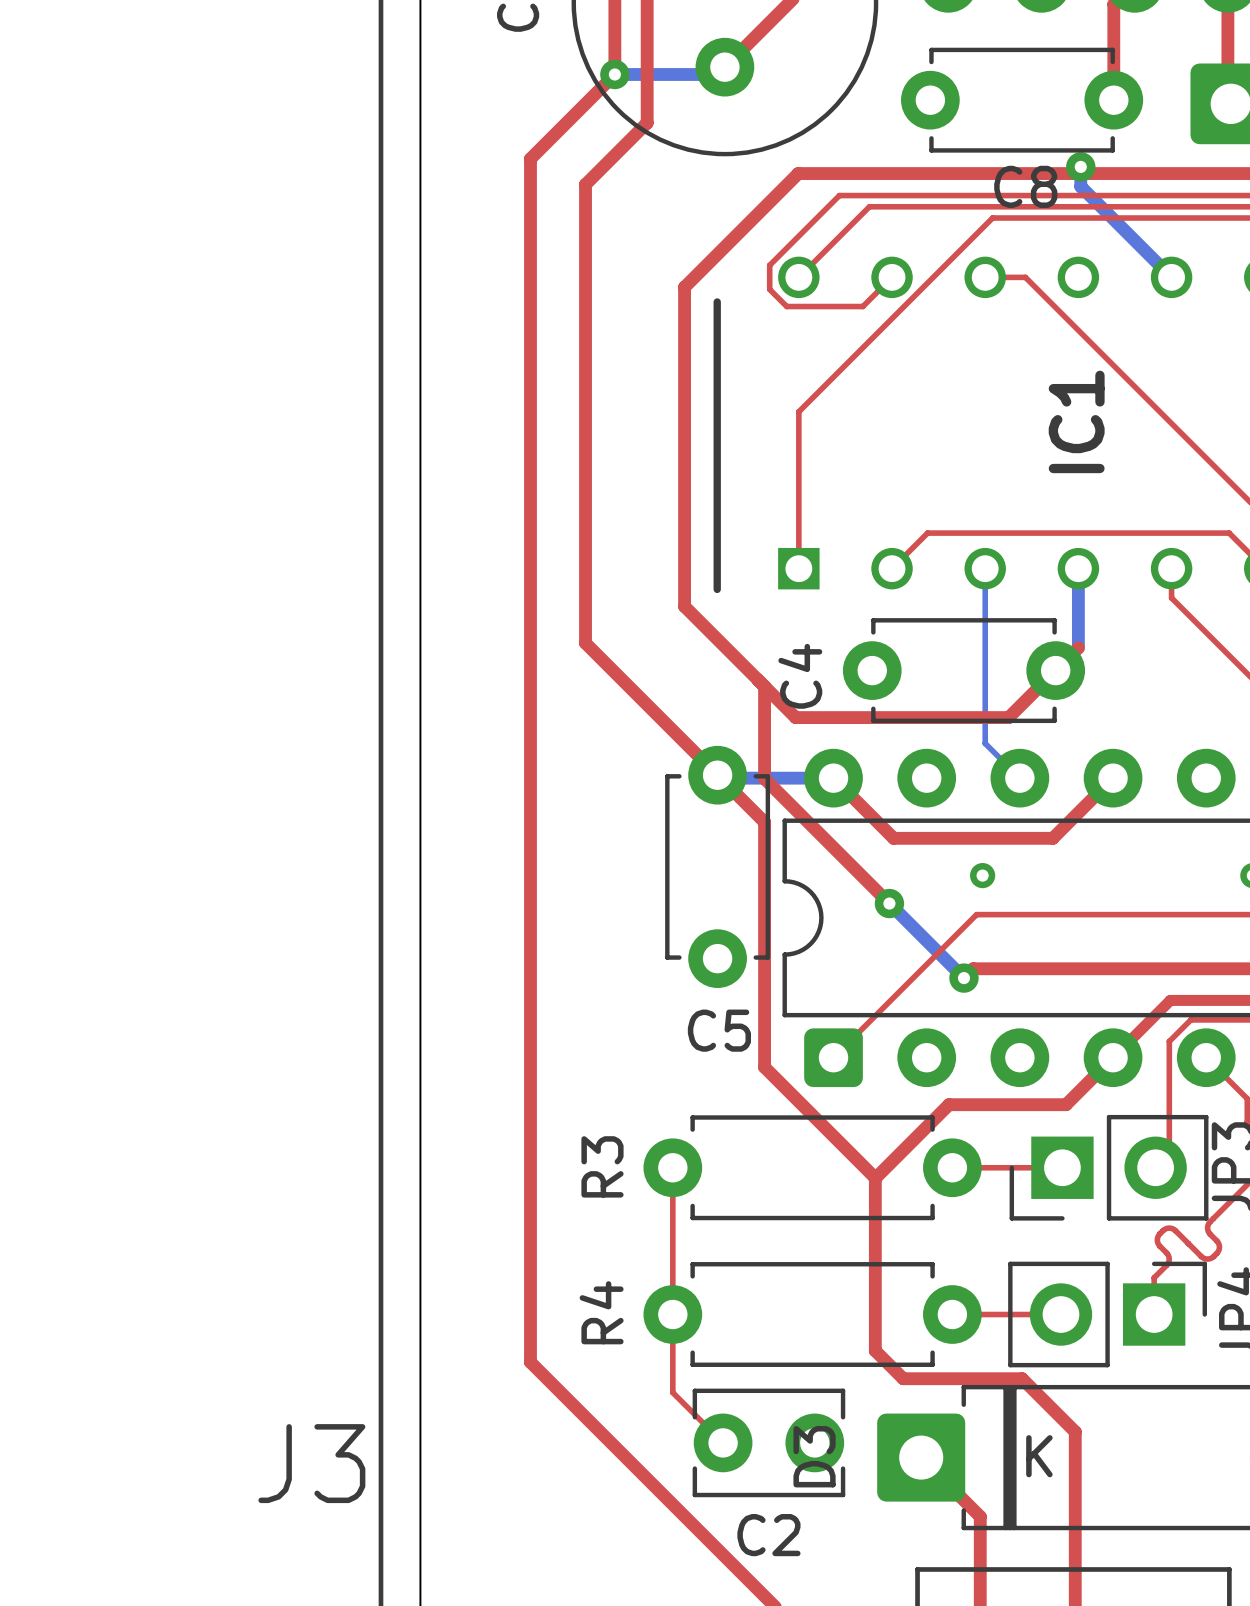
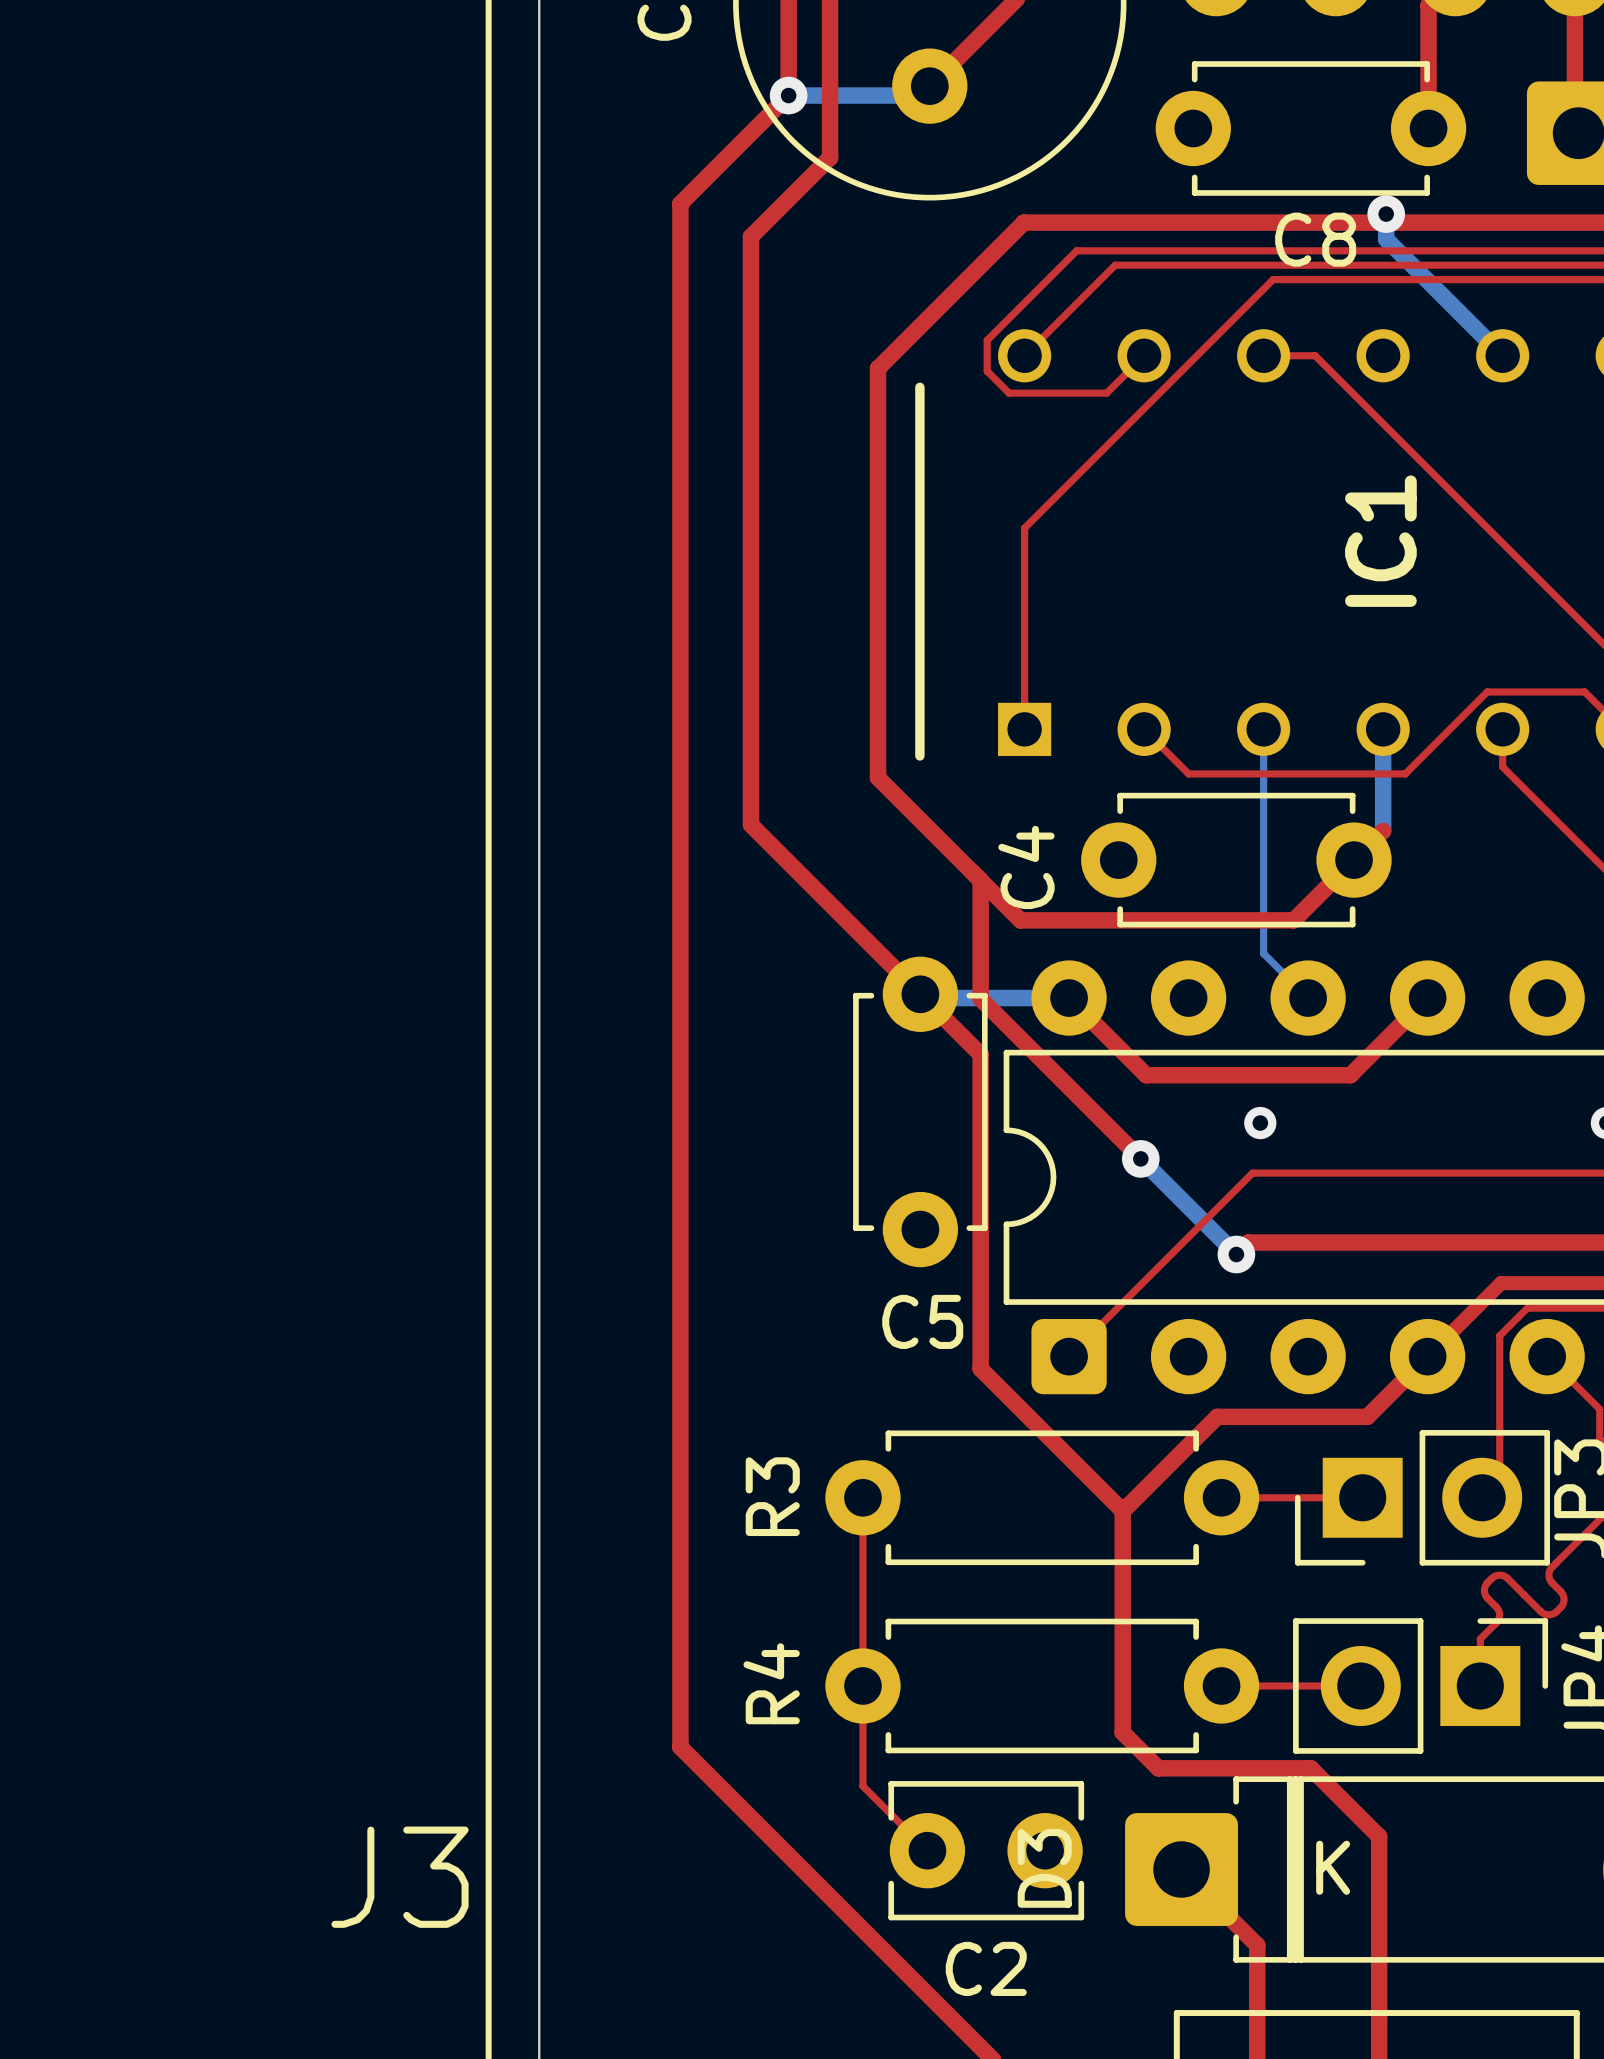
top track: (1235, 539) (1229, 533) (927, 533) (892, 568) -> (1584, 691) (1487, 691) (1405, 773) (1188, 773) (1144, 729)

